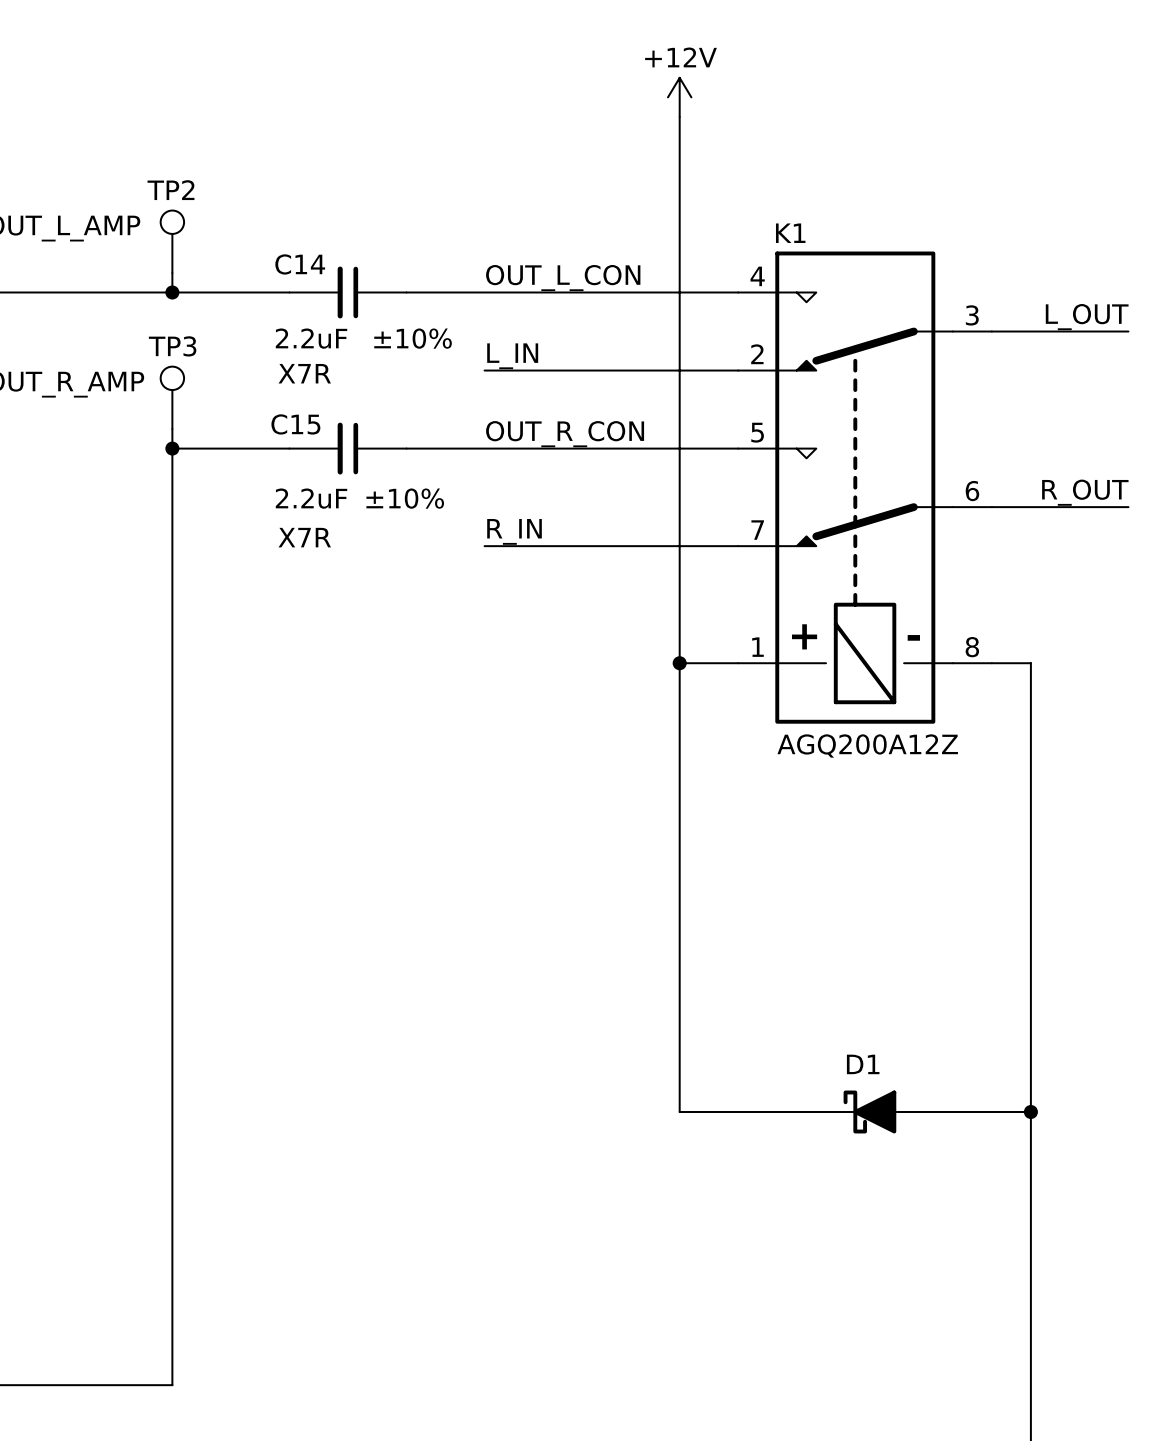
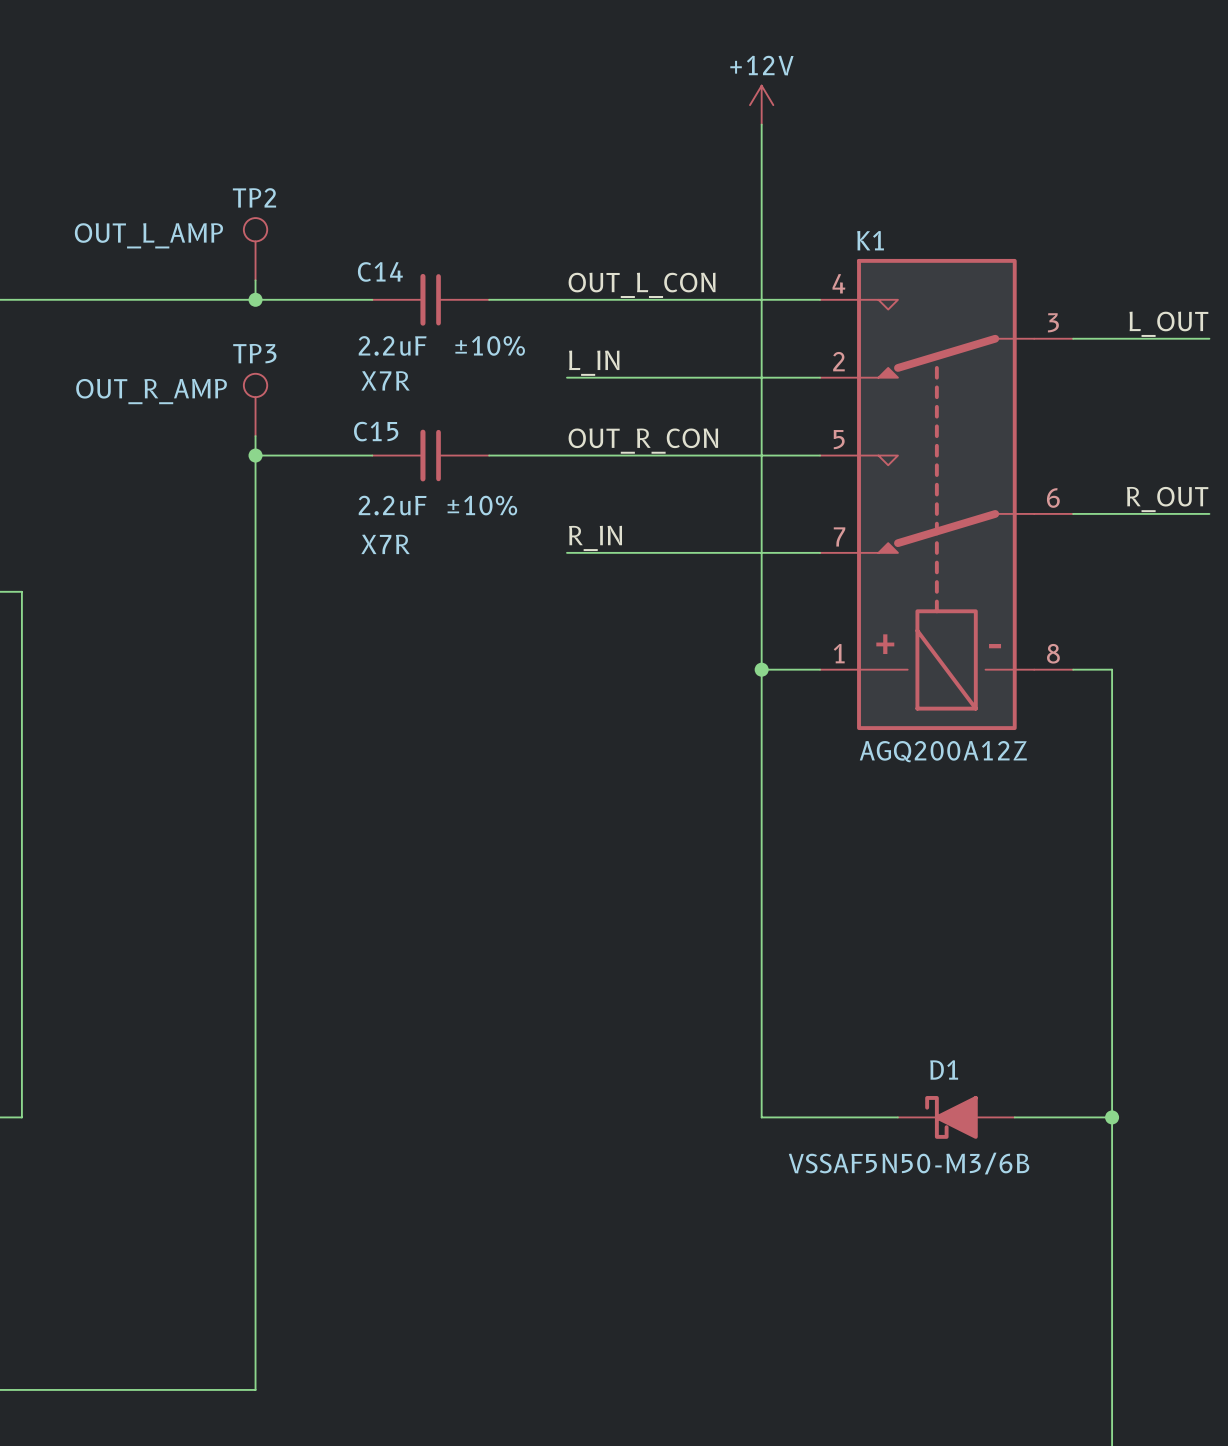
D1 value: none -> VSSAF5N50-M3/6B (909, 1163)

